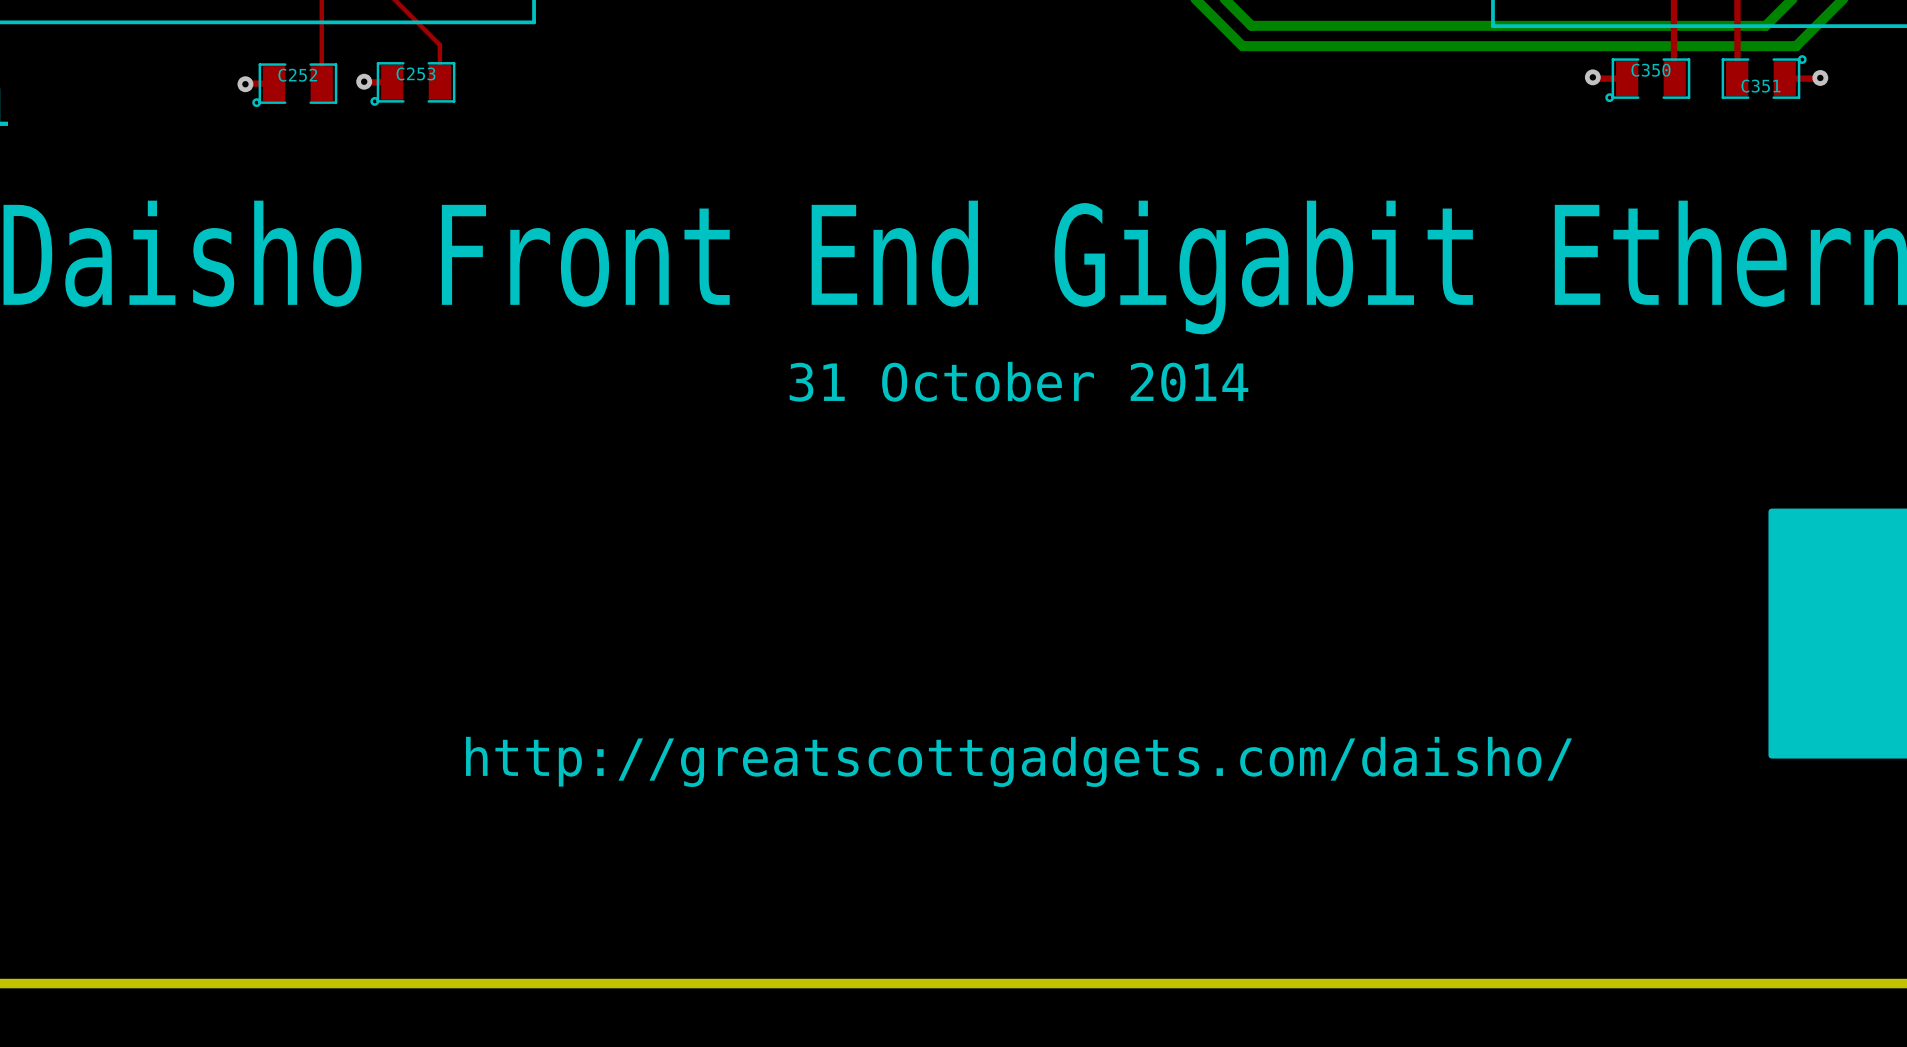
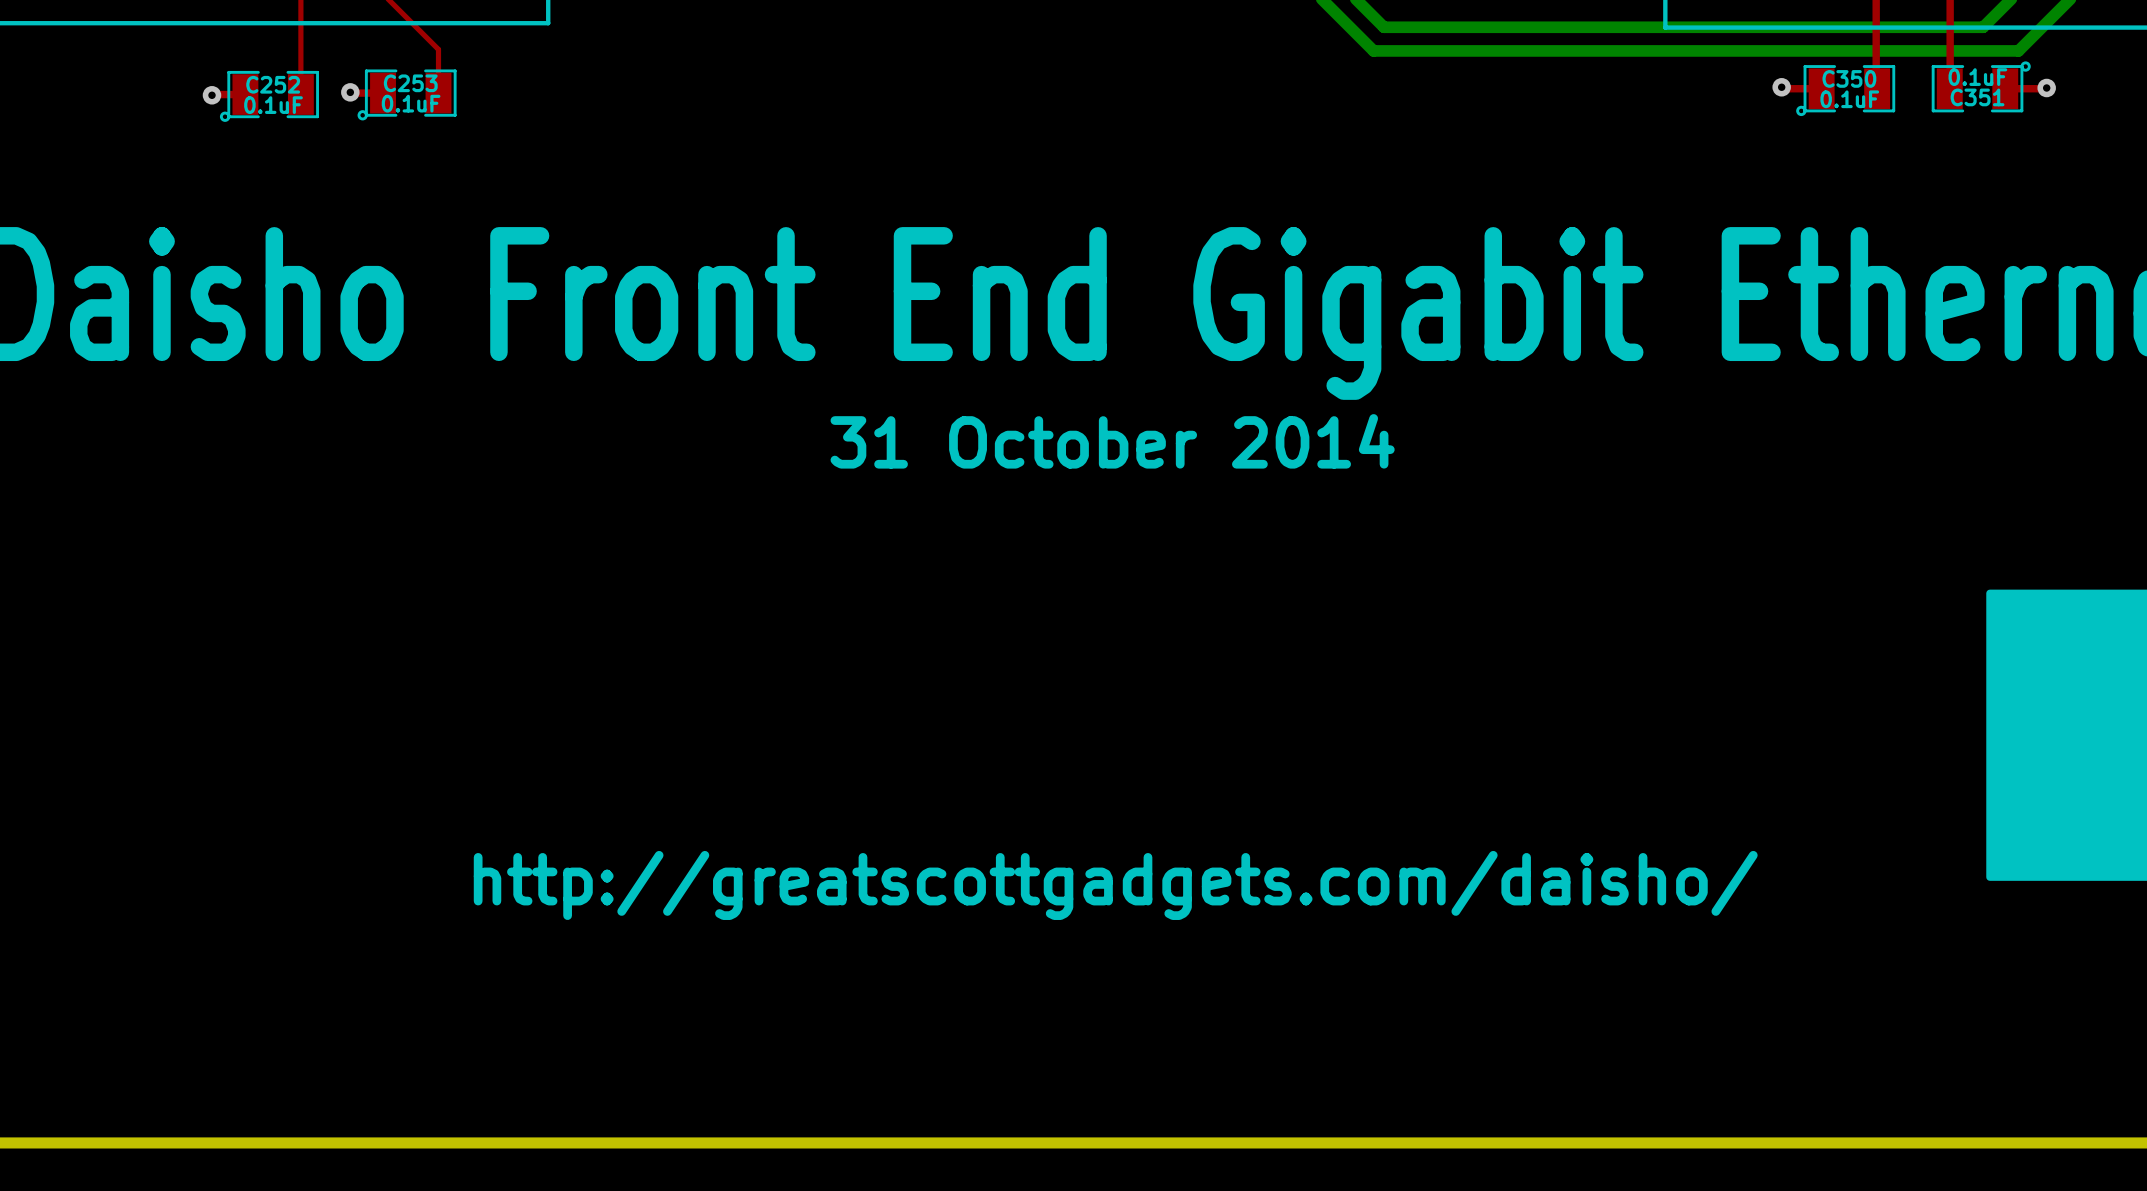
C351 value: none -> 0.1uF (1977, 77)
C350 value: none -> 0.1uF (1849, 99)
C253 value: none -> 0.1uF (411, 103)
C252 value: none -> 0.1uF (273, 105)

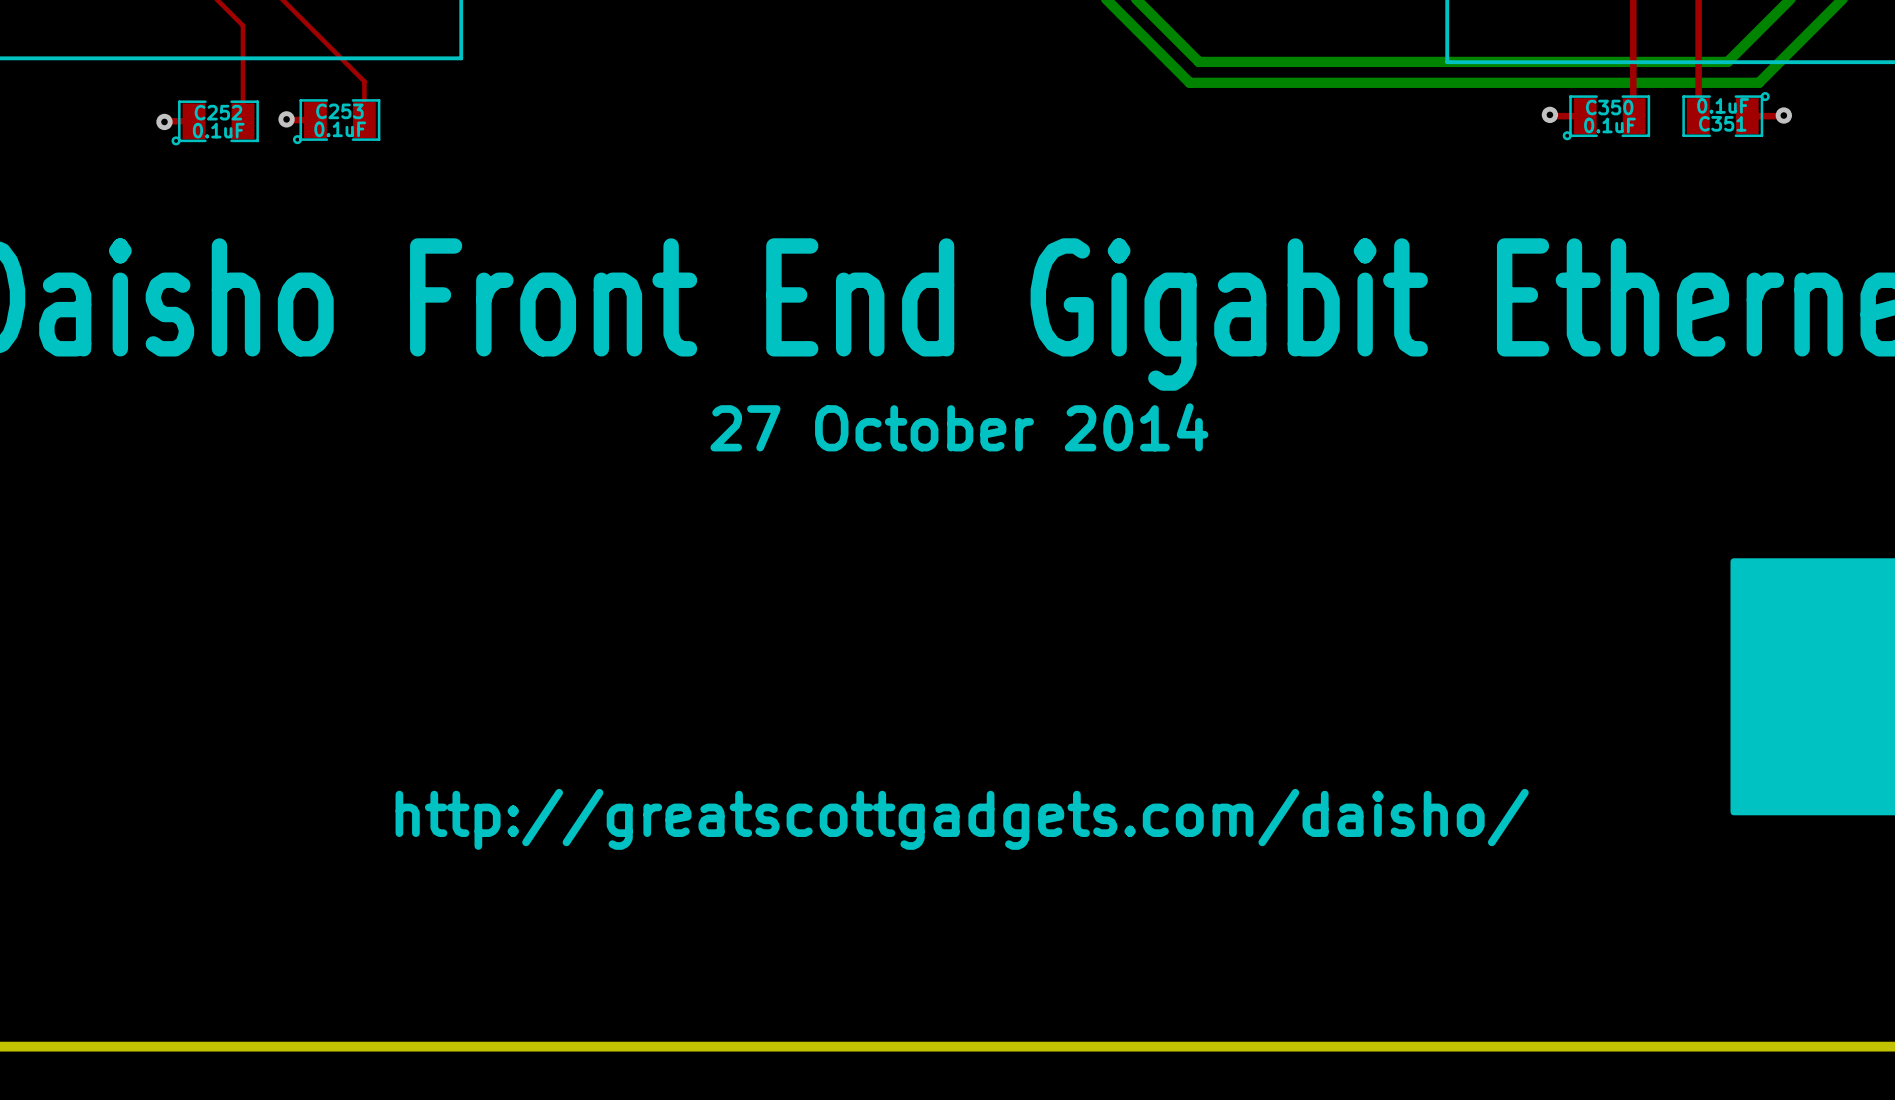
text: 31 October 2014 (1112, 441) -> 27 October 2014 (959, 427)

